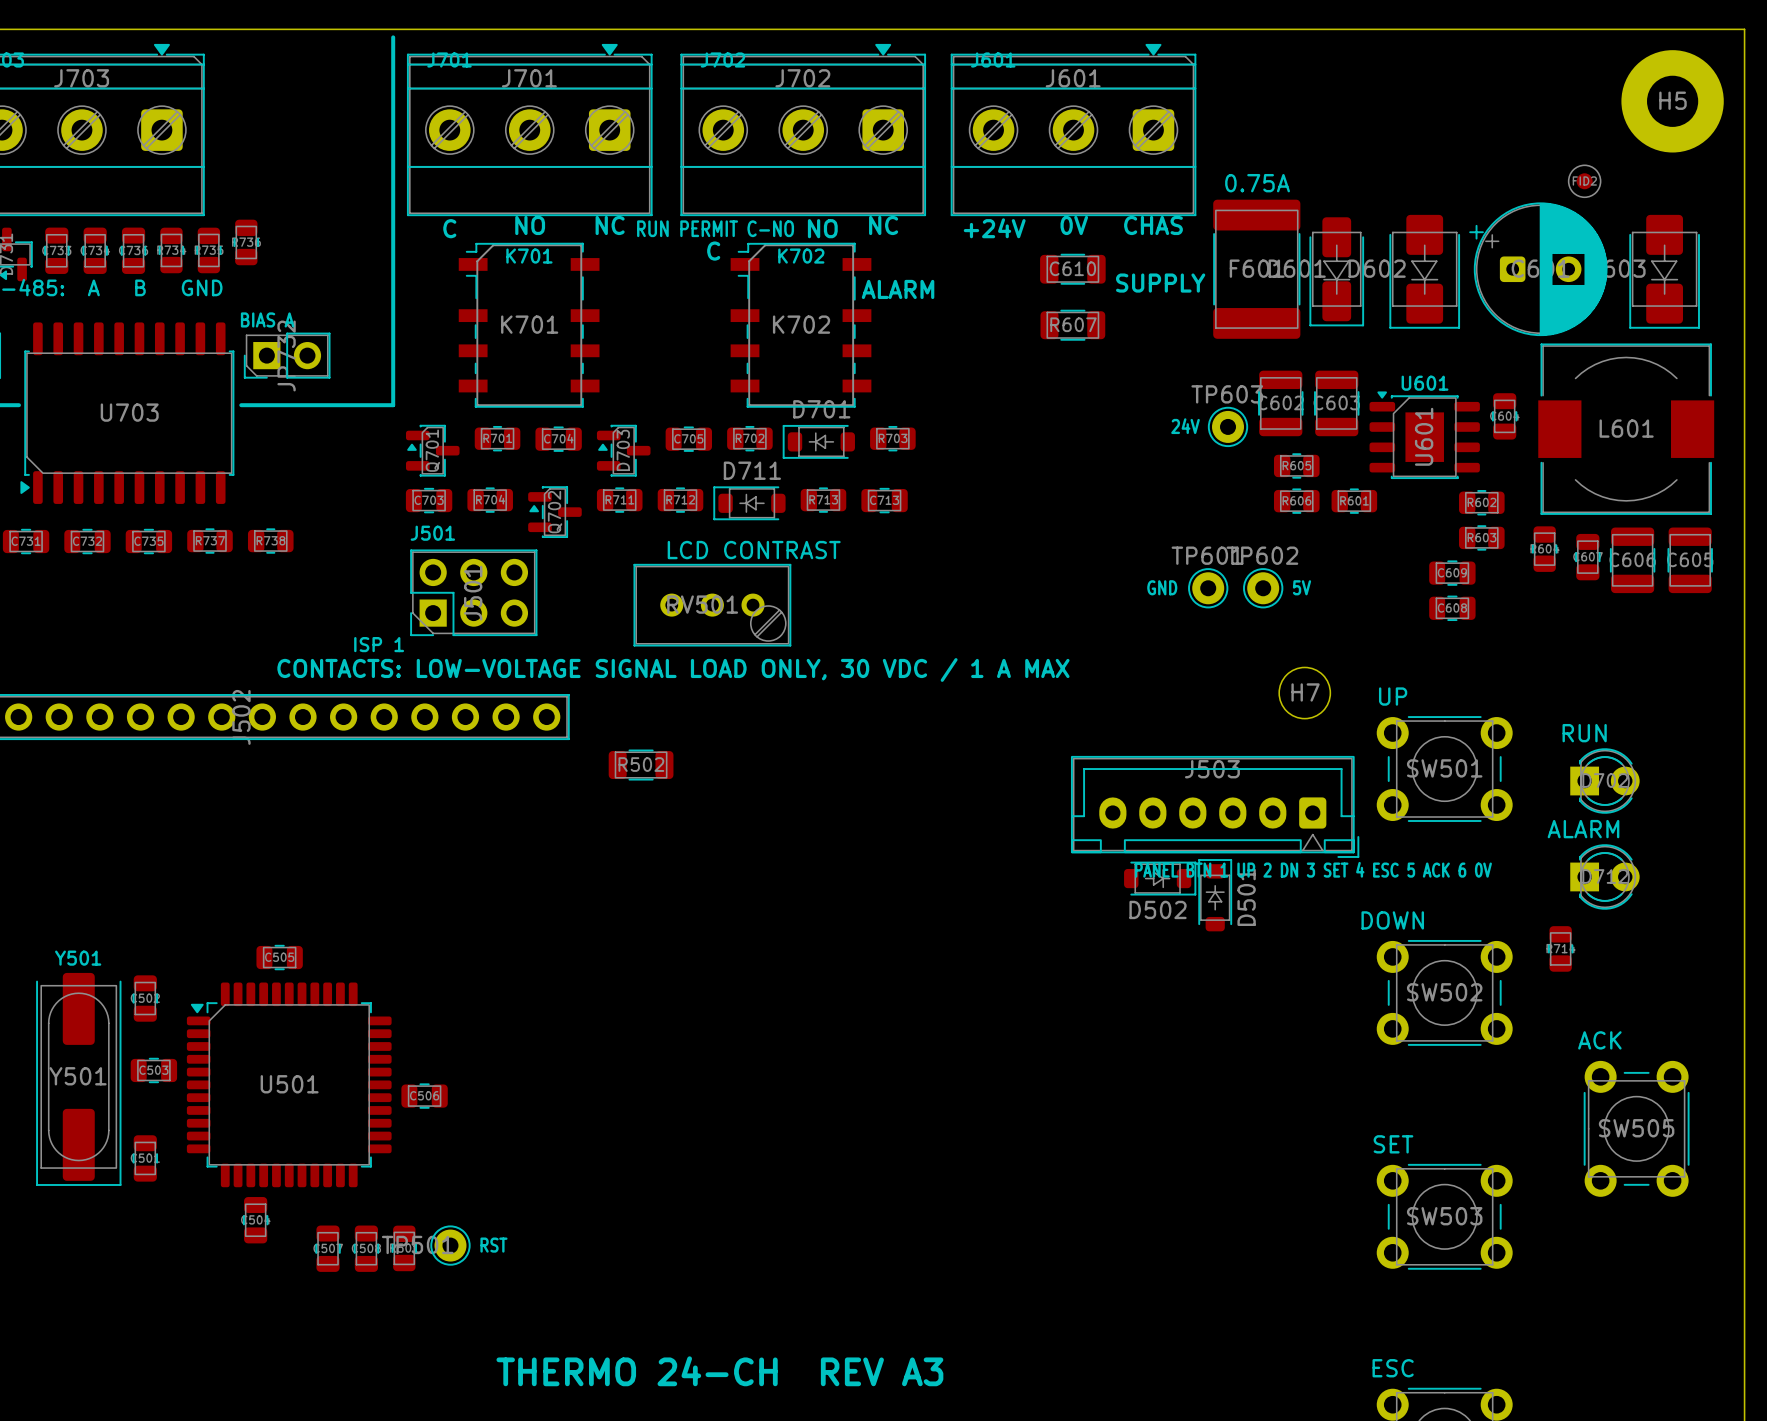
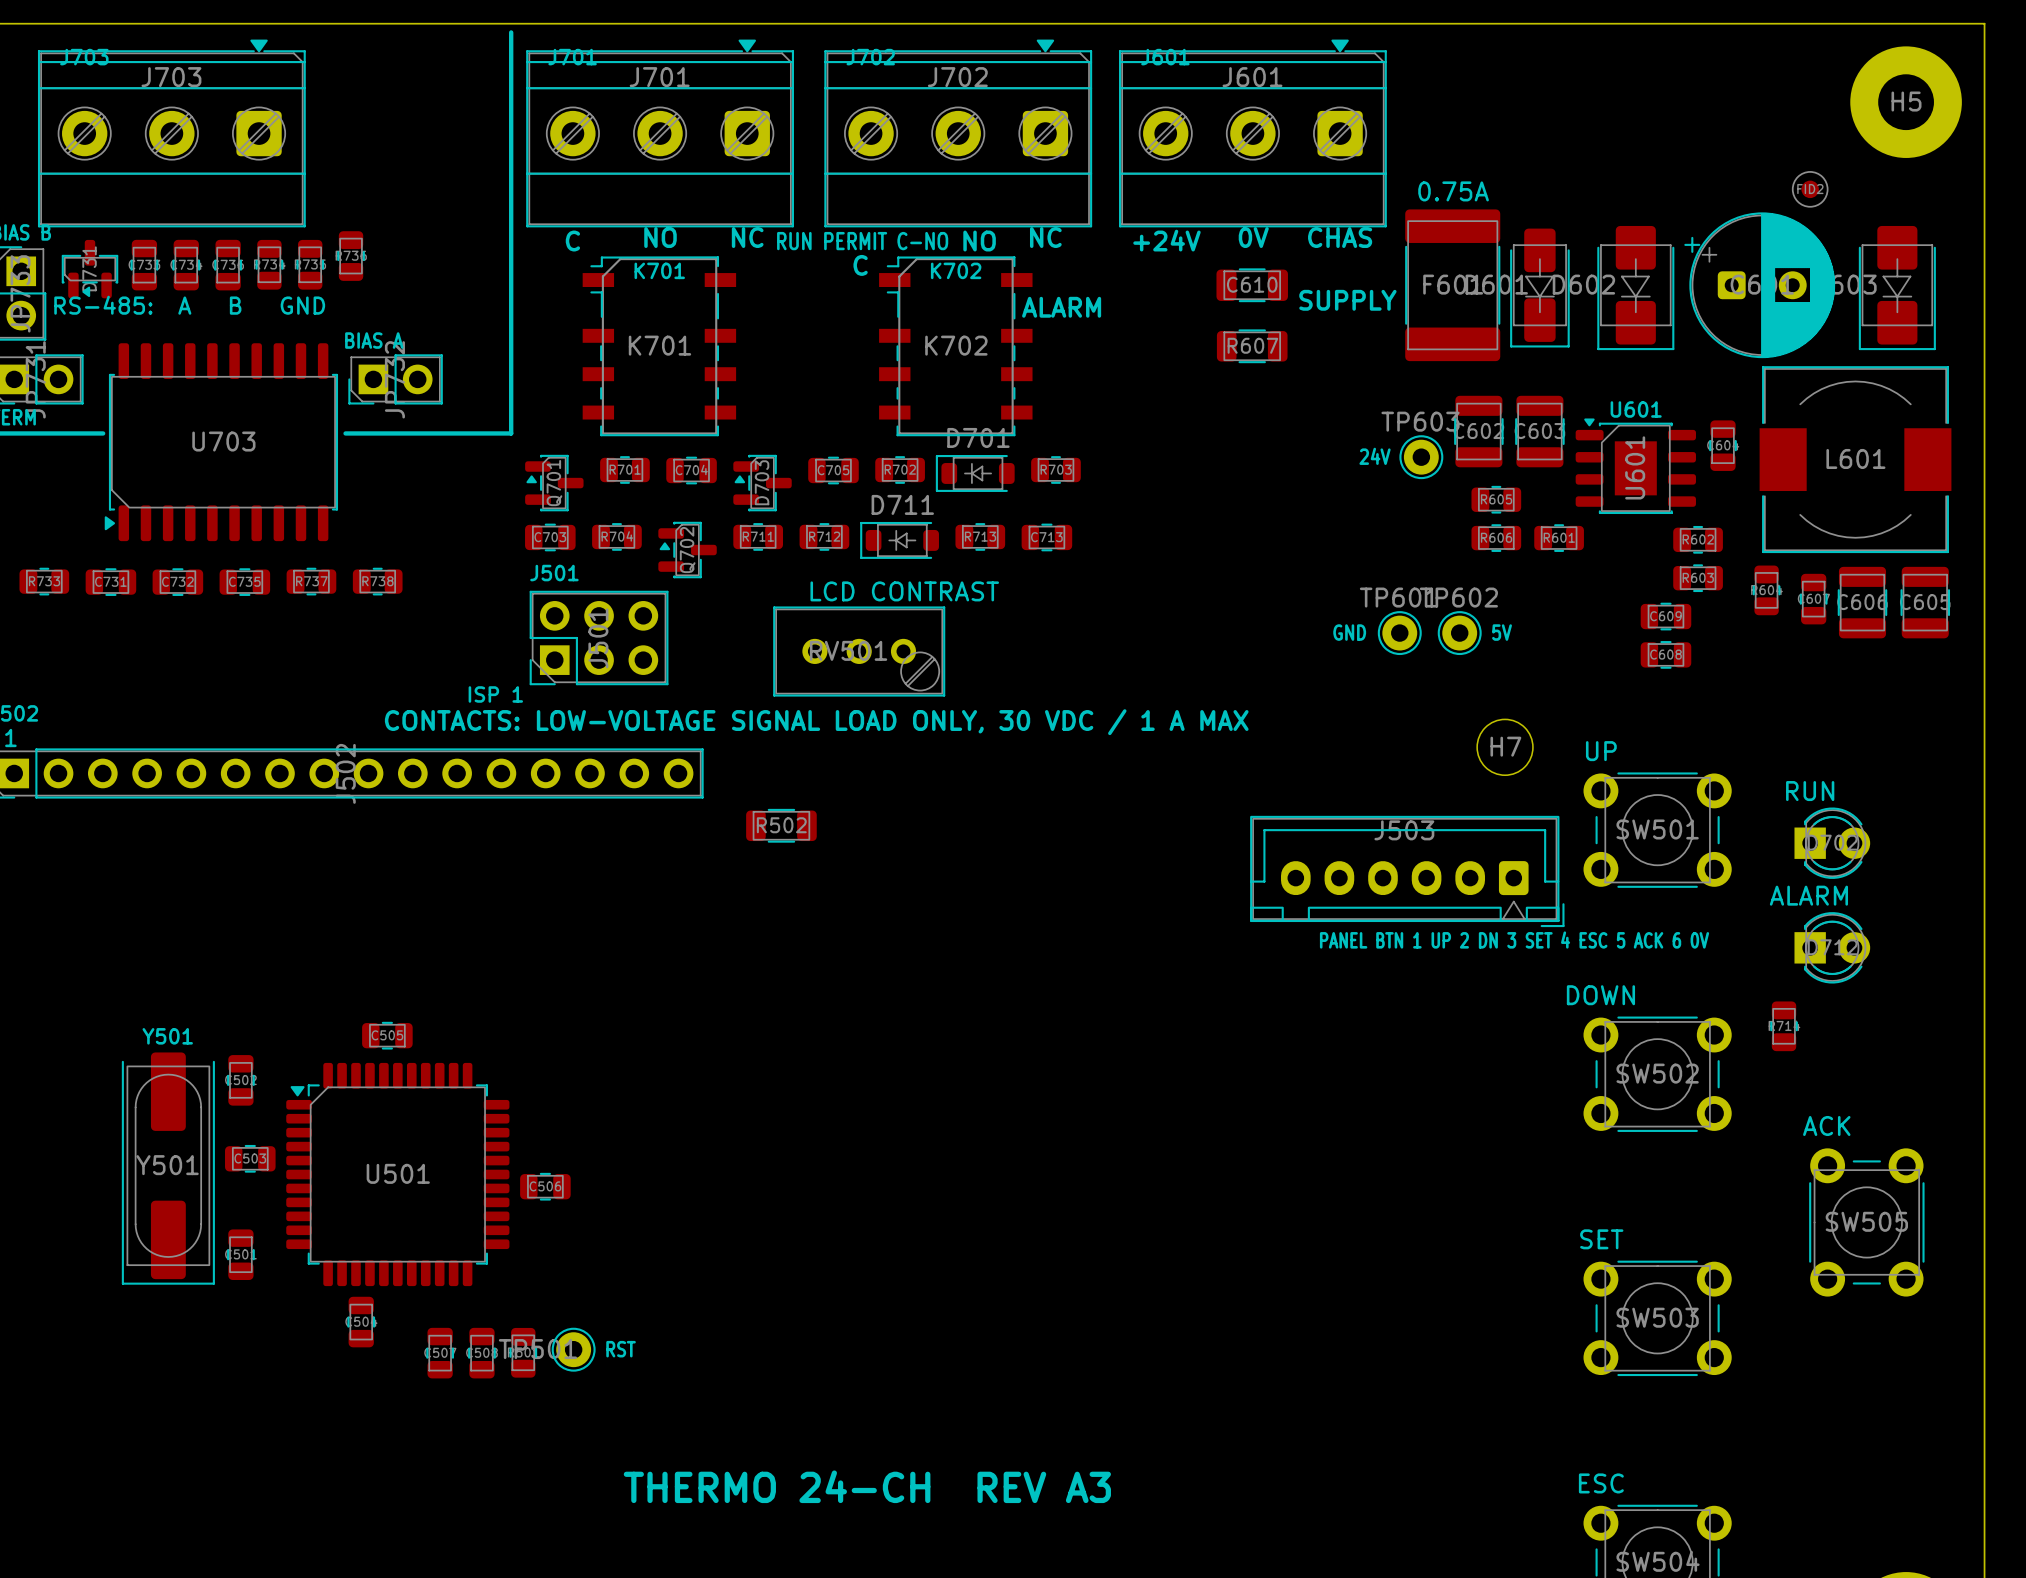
D502: (1160, 878) -> none
D501: (1215, 895) -> none

